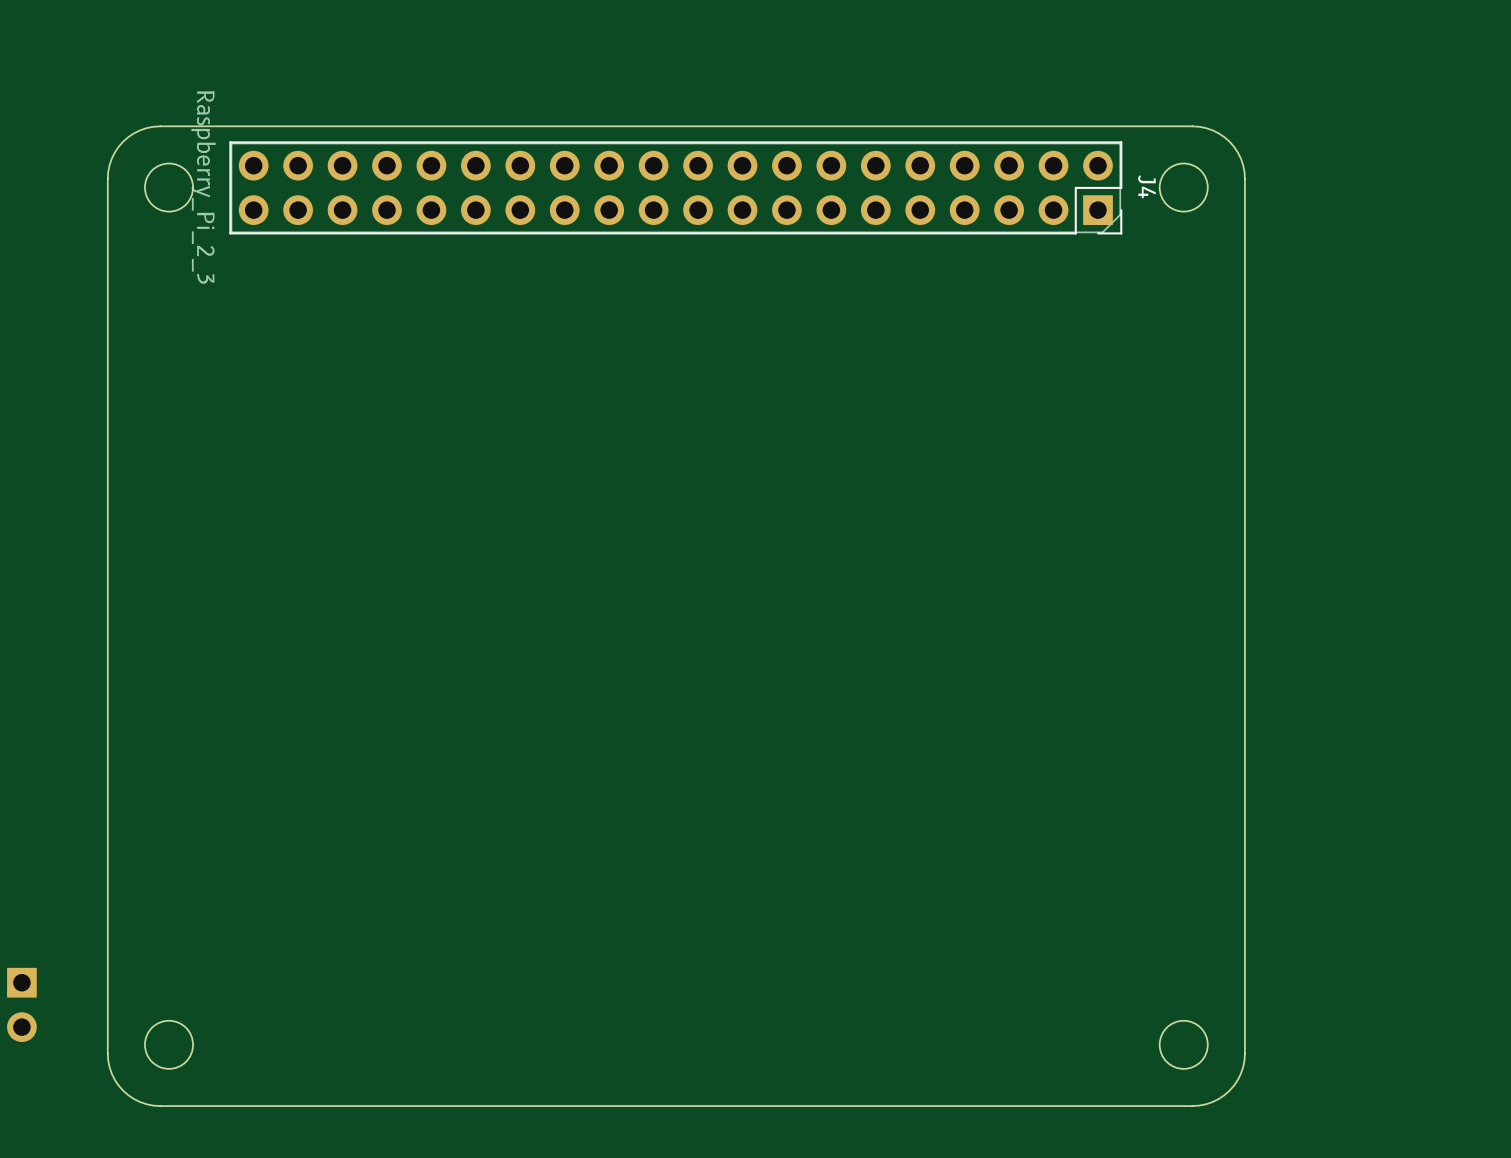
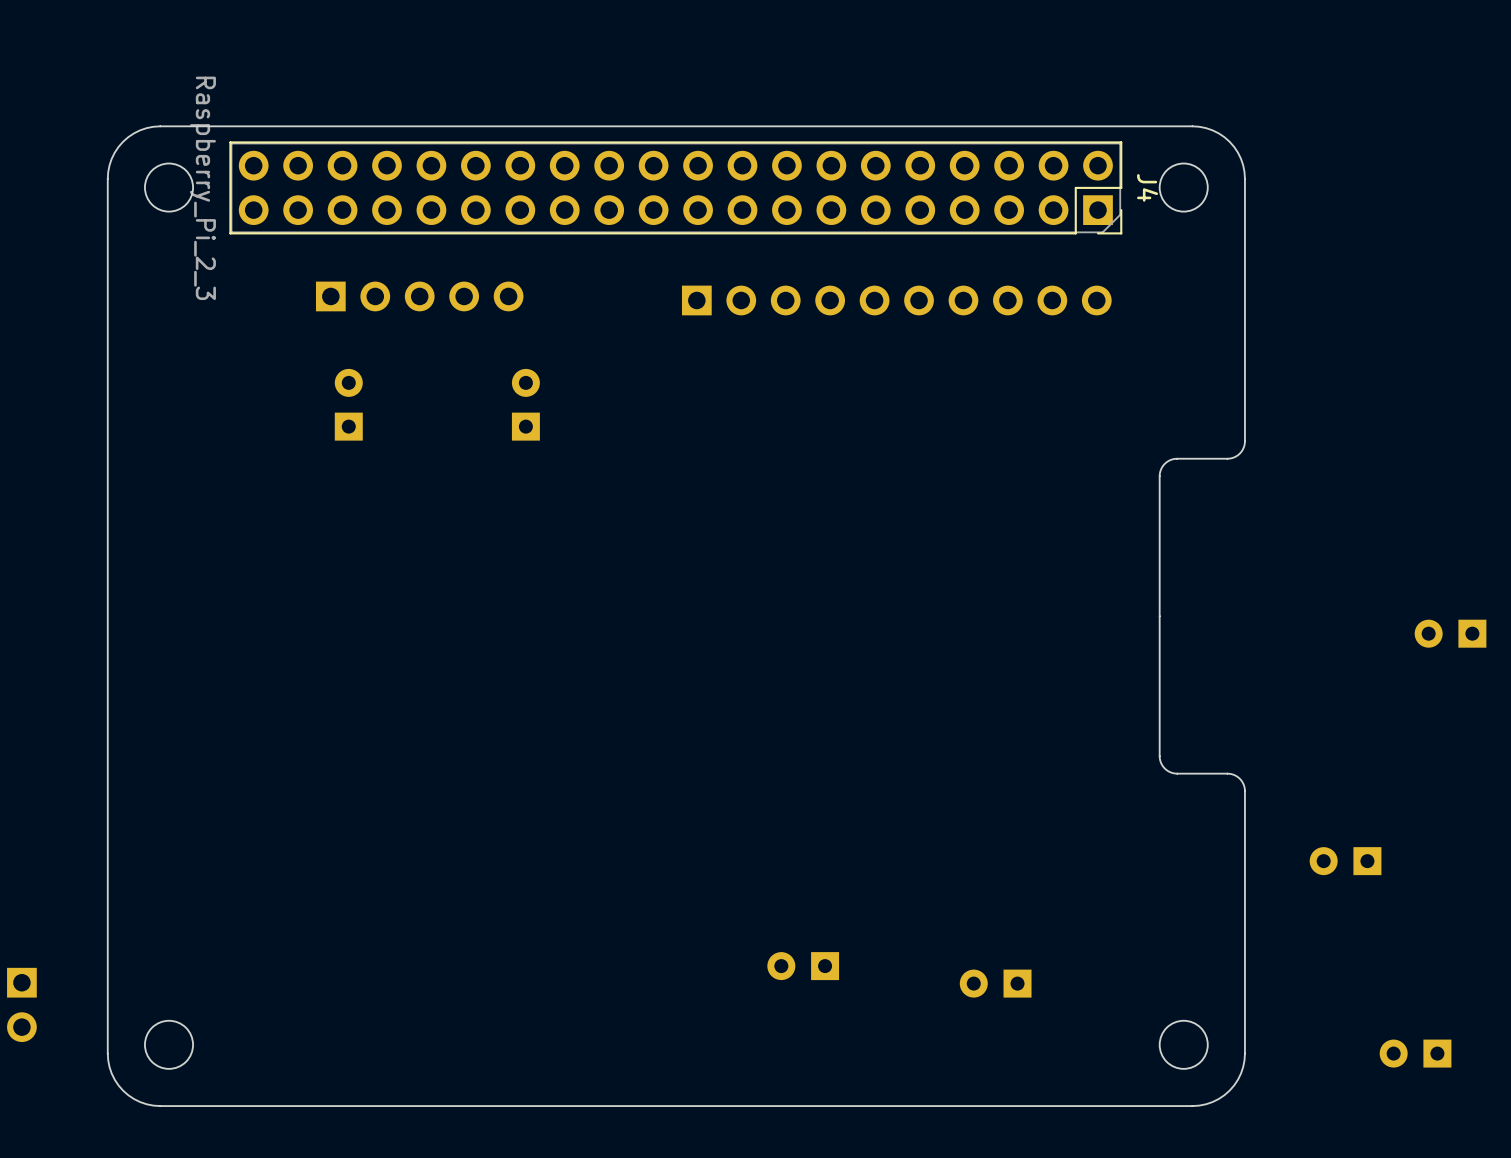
part: none -> (419, 296)
part: none -> (896, 300)
part: none -> (348, 404)
part: none -> (525, 404)
board edge: (1244, 441) (1244, 791) -> (1244, 441) (1241, 452) (1231, 458) (1171, 459) (1162, 466) (1159, 476) (1160, 760) (1164, 768) (1173, 773) (1233, 774) (1242, 781) (1244, 791)
part: none -> (1450, 633)
part: none -> (1345, 861)
part: none -> (803, 966)
part: none -> (995, 983)
part: none -> (1415, 1053)

